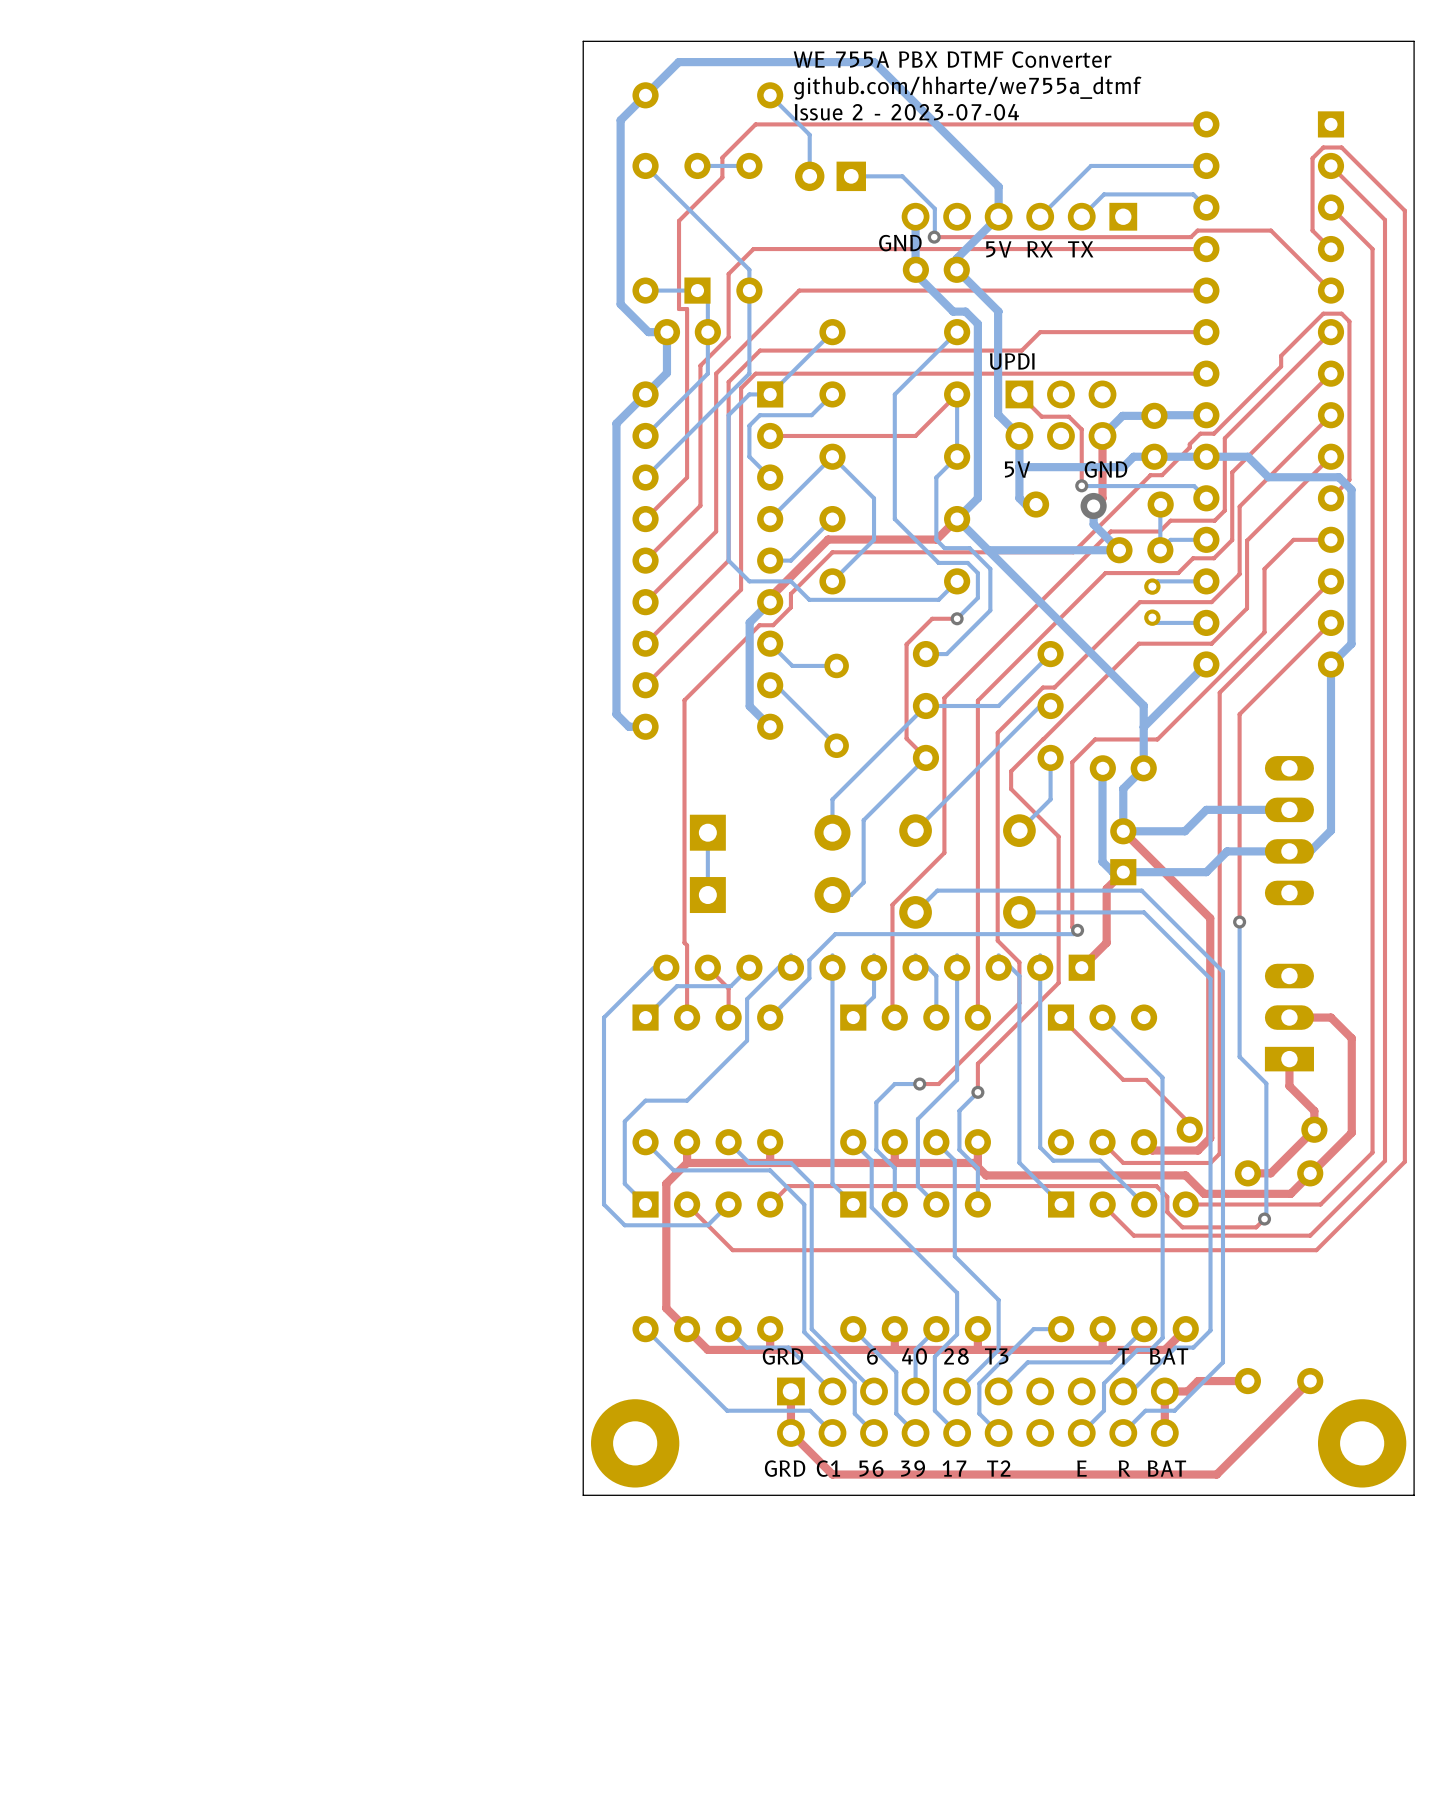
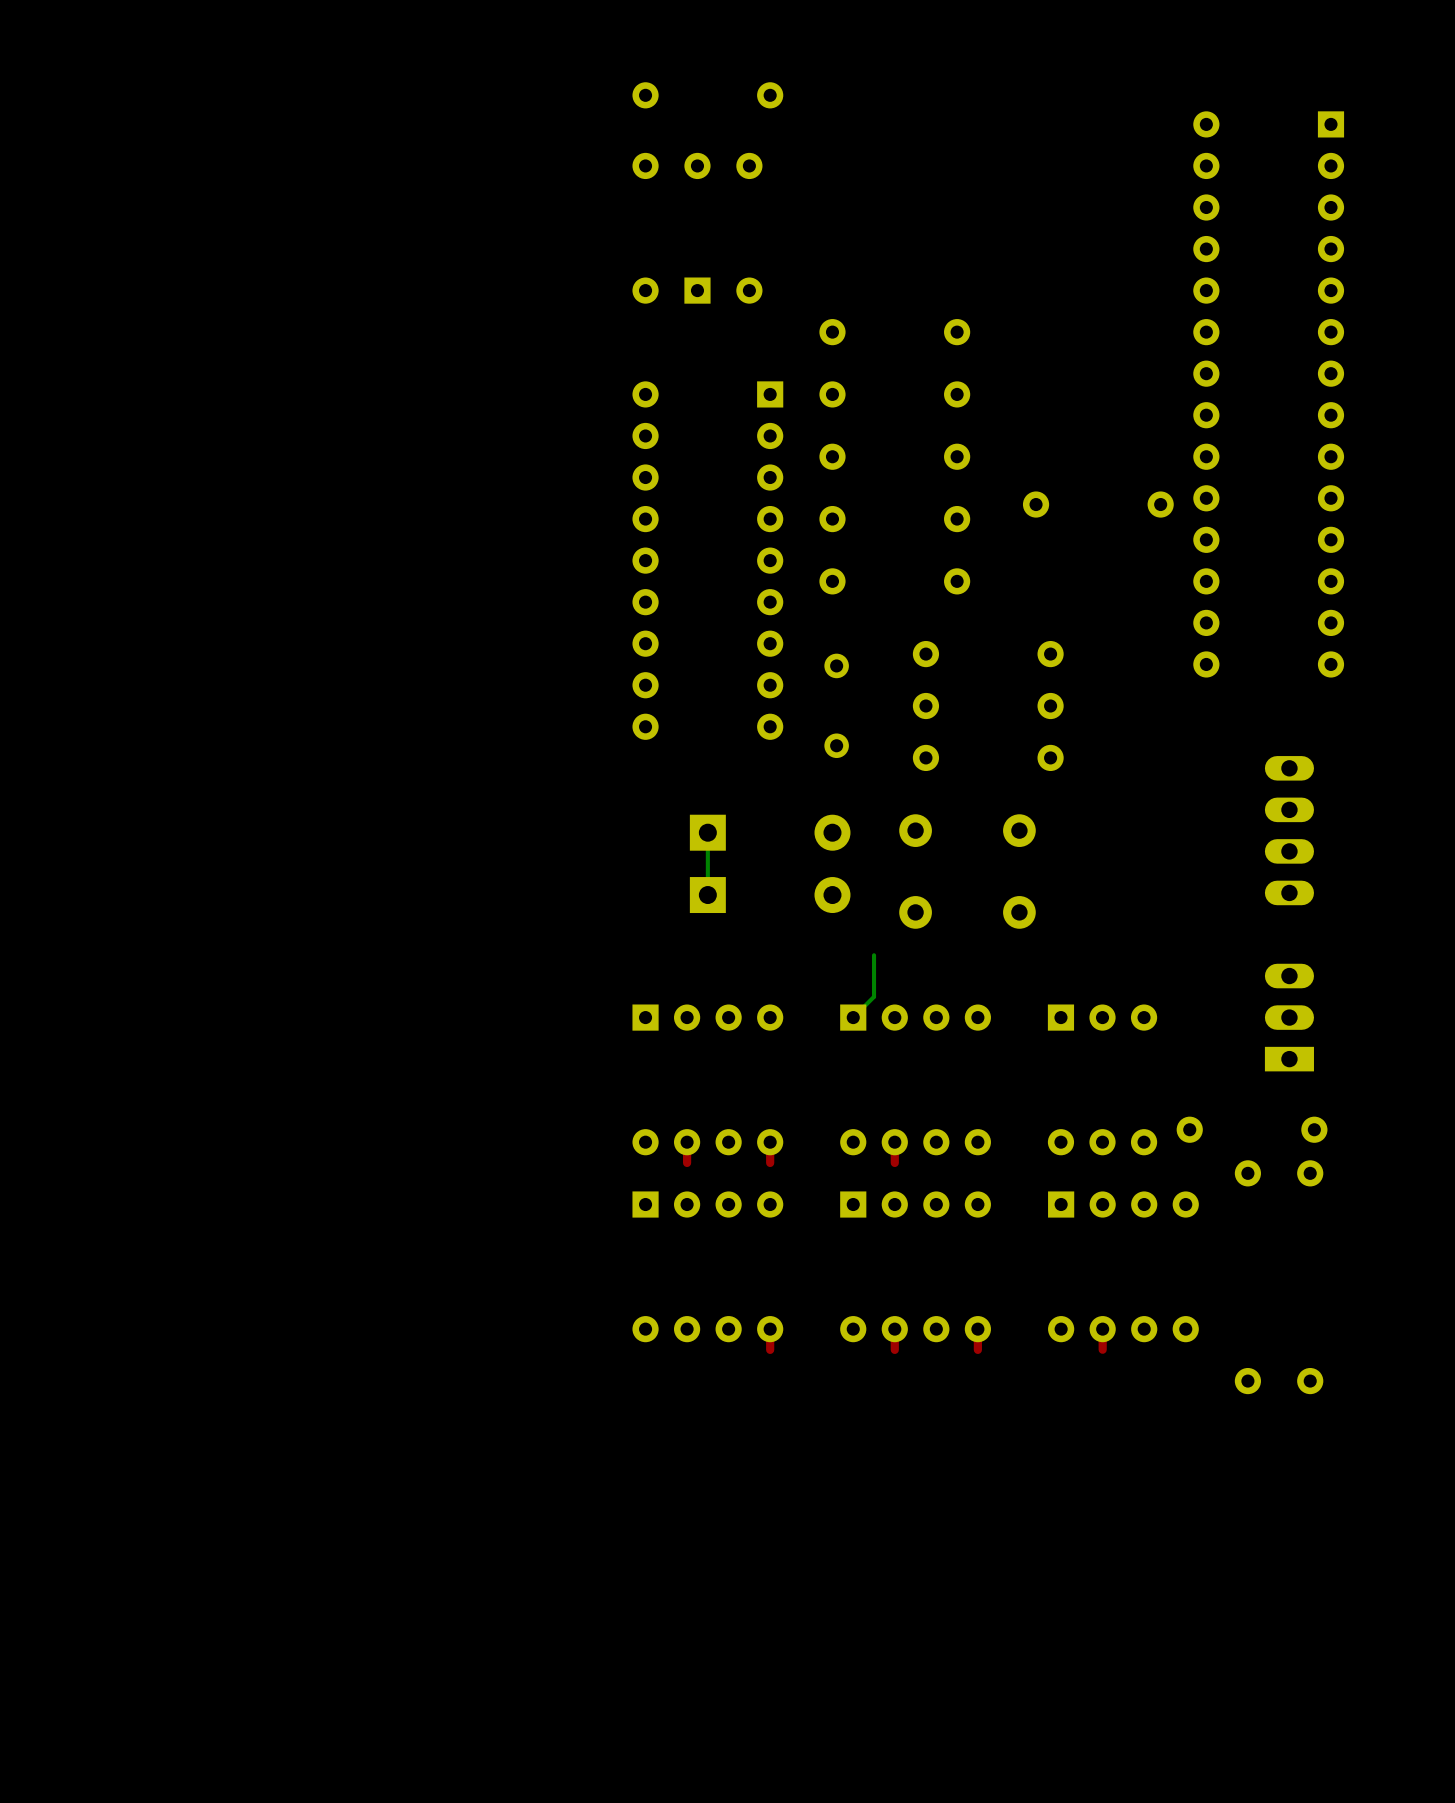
board edge: (1414, 41) (1414, 1495) (583, 1495) (583, 41) (1414, 41) -> none
text: WE 755A PBX DTMF Converter (952, 59) -> none
text: github.com/hharte/we755a_dtmf (967, 88) -> none
bottom track: (770, 95) (809, 134) (809, 165) -> none
text: Issue 2 - 2023-07-04 (906, 112) -> none
top track: (1206, 124) (755, 124) (722, 157) (722, 177) (679, 220) (679, 309) (687, 309) (687, 477) (645, 519) -> none
bottom track: (645, 165) (749, 269) (749, 373) (645, 477) -> none
bottom track: (749, 165) (697, 165) -> none
bottom track: (1206, 165) (1090, 165) (1040, 216) -> none
top track: (1330, 165) (1385, 219) (1385, 1160) (1310, 1235) (1133, 1235) (1102, 1204) -> none
part: (830, 176) -> none
bottom track: (851, 176) (902, 176) (934, 208) (934, 237) -> none
bottom track: (1206, 207) (1193, 194) (1104, 194) (1081, 216) -> none
top track: (1330, 207) (1372, 249) (1372, 1152) (1320, 1204) (1185, 1204) -> none
bottom track: (915, 216) (915, 274) (953, 311) (965, 311) (977, 323) (977, 498) (957, 519) (1143, 705) (1143, 768) (1123, 788) (1123, 831) (1184, 831) (1206, 809) (1289, 809) -> none
part: (1019, 216) -> none
top track: (934, 237) (1191, 237) (1197, 230) (1271, 230) (1330, 290) -> none
via: (934, 237) -> none
text: GND (900, 243) -> none
text: 5V (998, 249) -> none
text: RX (1040, 249) -> none
text: TX (1080, 249) -> none
top track: (1206, 249) (753, 249) (728, 273) (728, 337) (700, 365) (700, 505) (645, 560) -> none
top track: (1330, 249) (1312, 230) (1312, 158) (1323, 147) (1341, 147) (1404, 210) (1404, 1161) (1316, 1250) (732, 1250) (687, 1204) -> none
part: (936, 269) -> none
bottom track: (645, 290) (697, 290) (707, 300) (707, 373) (645, 435) -> none
top track: (1206, 290) (799, 290) (716, 373) (716, 531) (645, 602) -> none
part: (687, 332) -> none
bottom track: (832, 332) (770, 394) (749, 394) (728, 415) (728, 560) (749, 581) (790, 581) (809, 599) (938, 599) (957, 581) -> none
bottom track: (957, 332) (894, 394) (894, 519) (938, 562) (967, 562) (977, 573) (977, 597) (957, 618) -> none
top track: (1206, 332) (1040, 332) (1021, 350) (760, 350) (728, 381) (728, 560) (645, 643) -> none
top track: (1330, 332) (1224, 438) (1224, 510) (1214, 520) (1170, 520) (1159, 531) (1110, 531) (944, 697) (944, 852) (892, 904) (892, 1015) (894, 1017) -> none
text: UPDI (1012, 361) -> none
top track: (1206, 373) (755, 373) (741, 388) (741, 589) (645, 685) -> none
top track: (1330, 373) (1232, 472) (1232, 540) (1214, 558) (1193, 558) (1178, 573) (1105, 573) (977, 700) (977, 1017) -> none
bottom track: (832, 394) (811, 415) (759, 415) (749, 425) (749, 456) (770, 477) -> none
top track: (957, 394) (915, 435) (770, 435) -> none
bottom track: (957, 394) (957, 456) (936, 477) (936, 539) (944, 548) (969, 548) (990, 568) (990, 610) (946, 654) (925, 654) -> none
top track: (1019, 394) (1041, 416) (1068, 416) (1081, 429) (1081, 485) -> none
part: (1060, 415) -> none
bottom track: (1206, 415) (1122, 415) (1102, 435) -> none
top track: (1330, 415) (1239, 506) (1239, 574) (1211, 602) (1139, 602) (1054, 687) (1042, 687) (997, 732) (997, 940) (1019, 962) (1019, 1003) (938, 1084) (919, 1084) -> none
top track: (1102, 435) (1102, 498) (1093, 506) -> none
part: (1154, 436) -> none
top track: (1330, 456) (1247, 540) (1247, 608) (1211, 643) (1138, 643) (1043, 739) -> none
bottom track: (1019, 467) (1123, 467) (1133, 456) (1247, 456) (1268, 477) (1338, 477) (1351, 489) (1351, 643) (1330, 664) (1330, 830) (1310, 851) (1227, 851) (1206, 872) (1112, 872) (1102, 861) (1102, 768) -> none
text: 5V (1017, 469) -> none
text: GND (1106, 469) -> none
bottom track: (1081, 485) (1194, 486) (1206, 498) -> none
via: (1081, 485) -> none
top track: (1330, 498) (1349, 479) (1349, 321) (1341, 313) (1323, 313) (1281, 355) (1281, 366) (1214, 433) (1200, 433) (1189, 444) (1189, 447) (1162, 475) (1150, 475) (1073, 552) (832, 552) (790, 593) (790, 607) (773, 625) (759, 625) (684, 700) (684, 942) (687, 945) (687, 1017) -> none
bottom track: (1036, 504) (1025, 504) (1019, 498) (1019, 435) (998, 414) (998, 311) (956, 269) (956, 258) (998, 216) (998, 186) (874, 62) (678, 62) (620, 120) (620, 304) (648, 332) (666, 332) (666, 373) (616, 423) (616, 714) (628, 726) (645, 726) -> none
bottom track: (1160, 504) (1160, 550) (1170, 539) (1206, 539) -> none
bottom track: (1093, 506) (1093, 524) (1119, 550) (988, 550) -> none
via: (1093, 506) -> none
bottom track: (770, 519) (832, 456) (874, 498) (874, 539) (832, 581) -> none
bottom track: (832, 519) (790, 560) (770, 560) -> none
top track: (957, 519) (936, 539) (828, 539) (770, 597) (770, 602) -> none
top track: (1330, 539) (1293, 539) (1264, 568) (1264, 632) (1157, 739) (1095, 739) (1072, 762) (1072, 927) (1077, 930) -> none
part: (1139, 550) -> none
bottom track: (1206, 581) (1157, 581) (1152, 586) -> none
top track: (1330, 581) (1219, 692) (1219, 1153) (1210, 1162) (1123, 1162) (1102, 1142) -> none
bottom track: (770, 602) (749, 622) (749, 706) (770, 726) -> none
part: (1152, 602) -> none
bottom track: (1152, 617) (1157, 622) (1206, 622) -> none
top track: (957, 618) (932, 618) (906, 644) (906, 738) (925, 757) -> none
via: (957, 618) -> none
top track: (1330, 622) (1239, 714) (1239, 922) -> none
bottom track: (770, 643) (792, 665) (836, 665) -> none
bottom track: (1050, 654) (998, 706) (925, 706) (832, 799) (832, 832) -> none
bottom track: (1206, 664) (1143, 727) -> none
bottom track: (770, 685) (776, 685) (836, 745) -> none
bottom track: (1050, 706) (1040, 706) (915, 830) -> none
top track: (1043, 739) (1011, 771) (1011, 789) (1058, 836) (1058, 982) (977, 1063) (977, 1092) -> none
bottom track: (925, 757) (863, 820) (863, 882) (851, 895) (832, 895) -> none
bottom track: (1050, 757) (1050, 799) (1019, 830) -> none
part: (1123, 768) -> none
top track: (1123, 831) (1210, 918) (1210, 1138) (1197, 1150) (1152, 1150) (1144, 1142) -> none
part: (1123, 851) -> none
top track: (1123, 872) (1106, 888) (1106, 942) (1081, 967) -> none
bottom track: (915, 912) (937, 890) (1141, 890) (1222, 971) (1222, 1362) (1174, 1410) (1145, 1410) (1123, 1432) -> none
bottom track: (1019, 912) (1144, 912) (1210, 978) (1210, 1330) (1193, 1347) (1175, 1347) (1131, 1391) (1123, 1391) -> none
bottom track: (1239, 922) (1239, 1056) (1266, 1083) (1266, 1217) (1264, 1219) -> none
via: (1239, 922) -> none
bottom track: (1077, 930) (1073, 934) (835, 934) (809, 960) (809, 978) (770, 1017) -> none
via: (1077, 930) -> none
bottom track: (790, 955) (747, 999) (747, 1040) (687, 1100) (645, 1100) (624, 1121) (624, 1183) (645, 1204) -> none
bottom track: (832, 955) (832, 1183) (853, 1204) -> none
bottom track: (915, 955) (936, 976) (936, 1017) -> none
bottom track: (957, 955) (957, 1079) (917, 1119) (917, 1186) (936, 1204) -> none
bottom track: (998, 955) (1019, 976) (1019, 1162) (1061, 1204) -> none
bottom track: (1040, 955) (1040, 1147) (1053, 1160) (1100, 1160) (1144, 1204) -> none
top track: (703, 963) (728, 988) (728, 1017) -> none
bottom track: (653, 967) (604, 1017) (604, 1204) (624, 1225) (707, 1225) (728, 1204) -> none
bottom track: (749, 967) (730, 986) (676, 986) (645, 1017) -> none
part: (874, 967) -> none
top track: (1060, 1017) (1123, 1079) (1146, 1079) (1187, 1121) -> none
bottom track: (1102, 1017) (1162, 1077) (1162, 1193) -> none
top track: (1289, 1017) (1330, 1017) (1351, 1038) (1351, 1132) (1290, 1193) (1204, 1193) (1185, 1175) (986, 1175) (973, 1162) -> none
top track: (1289, 1059) (1289, 1086) (1314, 1111) (1314, 1129) (1270, 1173) (1247, 1173) -> none
bottom track: (919, 1084) (894, 1084) (876, 1102) (876, 1149) (894, 1168) (894, 1204) -> none
via: (919, 1084) -> none
bottom track: (977, 1092) (959, 1110) (959, 1149) (977, 1168) (977, 1204) -> none
via: (977, 1092) -> none
bottom track: (645, 1142) (673, 1170) (770, 1170) (804, 1204) (804, 1332) (854, 1382) (854, 1413) (874, 1432) -> none
bottom track: (728, 1142) (749, 1162) (790, 1162) (811, 1183) (811, 1329) (874, 1391) -> none
bottom track: (853, 1142) (871, 1160) (871, 1207) (957, 1292) (957, 1334) (934, 1356) (934, 1410) (957, 1432) -> none
bottom track: (936, 1142) (954, 1160) (954, 1256) (998, 1300) (998, 1349) (957, 1391) -> none
top track: (977, 1142) (977, 1162) (687, 1162) (666, 1183) (666, 1308) (707, 1349) (1164, 1349) (1185, 1329) -> none
bottom track: (1162, 1194) (1162, 1337) (1150, 1349) (1137, 1349) (1104, 1383) (1104, 1410) (1081, 1432) -> none
top track: (770, 1204) (788, 1186) (1156, 1186) (1167, 1196) (1167, 1212) (1182, 1227) (1256, 1227) (1264, 1219) -> none
via: (1264, 1219) -> none
bottom track: (645, 1329) (727, 1410) (810, 1410) (832, 1432) -> none
bottom track: (728, 1329) (747, 1347) (788, 1347) (832, 1391) -> none
bottom track: (853, 1329) (896, 1372) (896, 1413) (915, 1432) -> none
bottom track: (936, 1329) (915, 1349) (915, 1391) -> none
bottom track: (1061, 1329) (1033, 1329) (979, 1383) (979, 1413) (998, 1432) -> none
bottom track: (1144, 1329) (1110, 1362) (1027, 1362) (998, 1391) -> none
text: GRD (783, 1356) -> none
text: 6 (872, 1356) -> none
text: 40 (914, 1356) -> none
text: 28 (956, 1356) -> none
text: T3 (996, 1356) -> none
text: T (1123, 1356) -> none
text: BAT (1169, 1356) -> none
top track: (1247, 1381) (1198, 1381) (1187, 1391) (1164, 1391) (1164, 1432) -> none
top track: (1310, 1381) (1216, 1474) (832, 1474) (790, 1432) (790, 1391) -> none
part: (977, 1412) -> none
part: (635, 1443) -> none
part: (1362, 1443) -> none
text: GRD (785, 1468) -> none
text: C1 (828, 1468) -> none
text: 56 (871, 1468) -> none
text: 39 (913, 1468) -> none
text: 17 (954, 1468) -> none
text: T2 (998, 1468) -> none
text: E (1081, 1468) -> none
text: R (1124, 1468) -> none
text: BAT (1166, 1468) -> none

